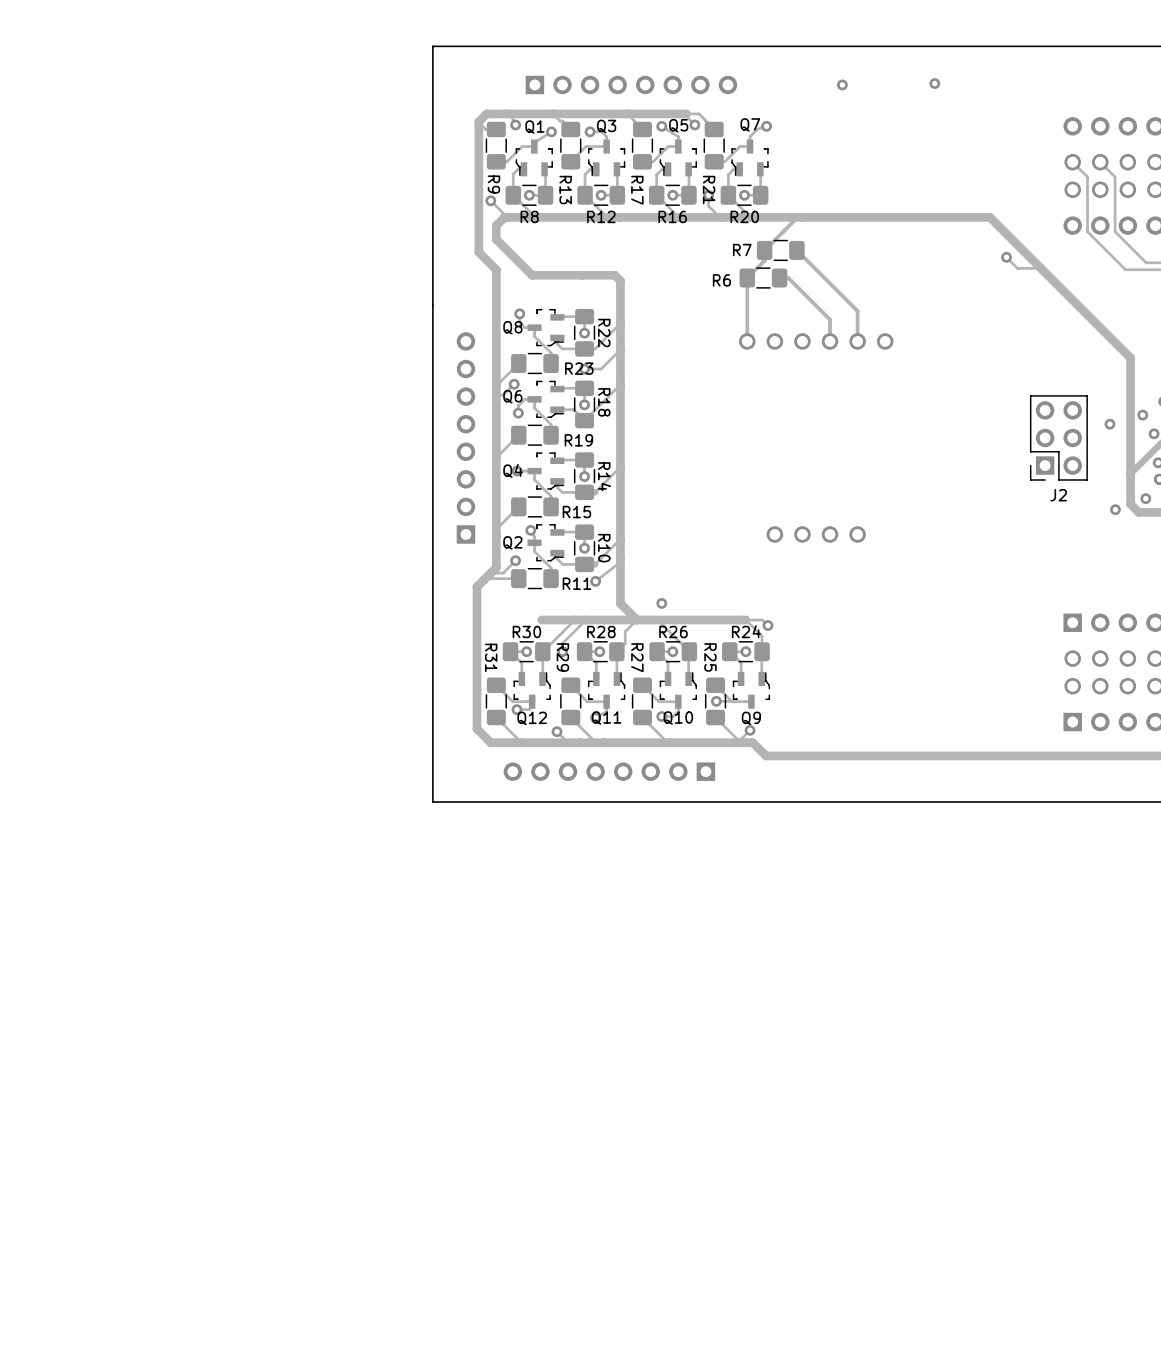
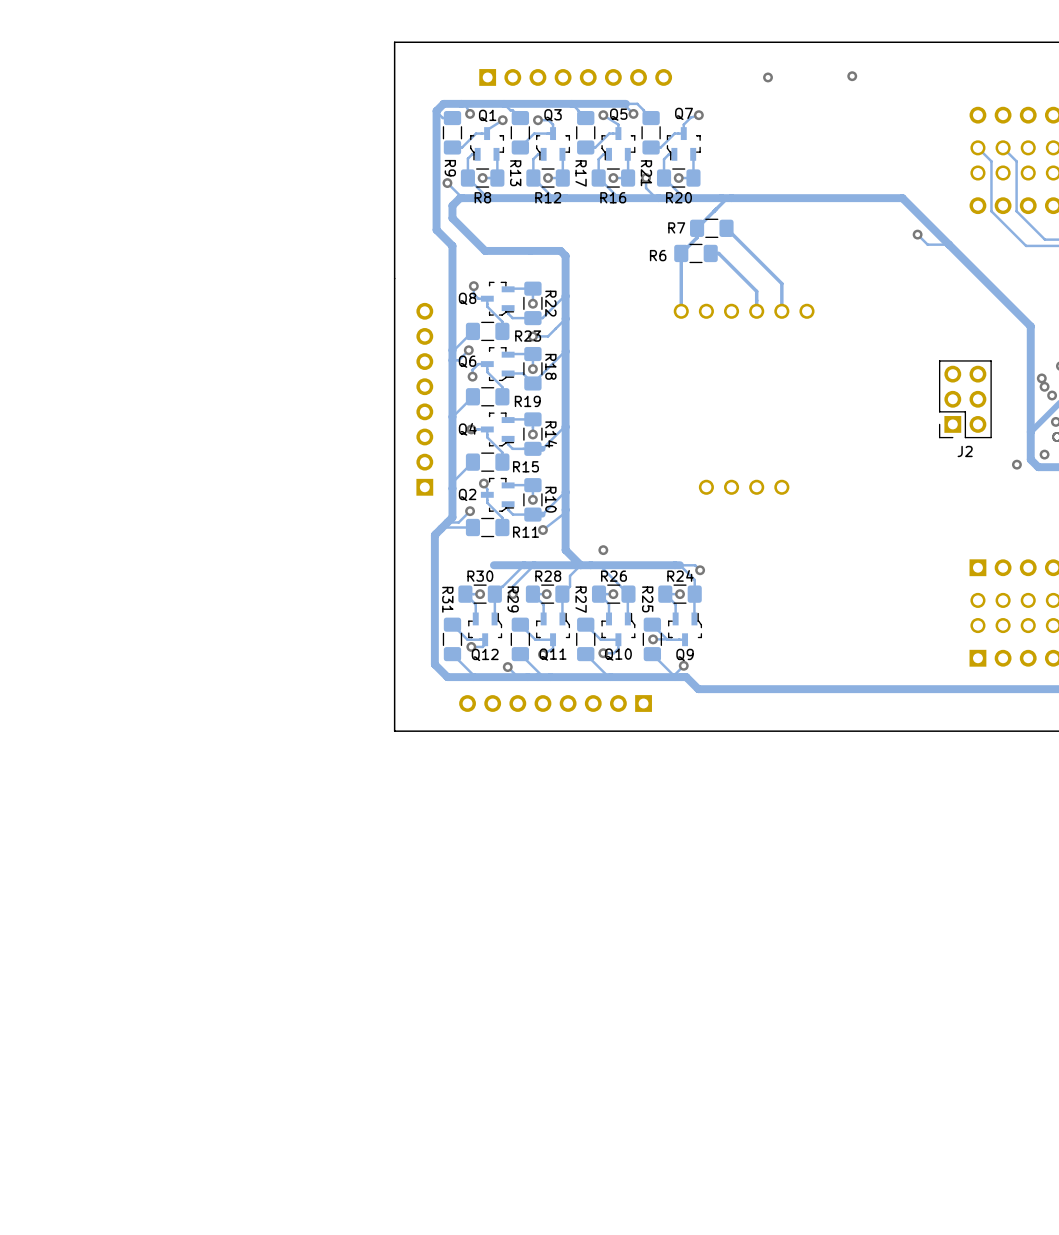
via position: (1109, 424) -> (1044, 386)

